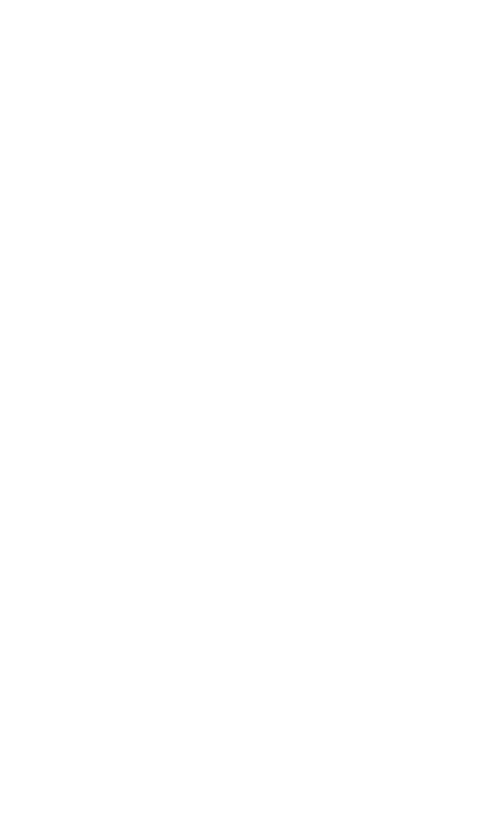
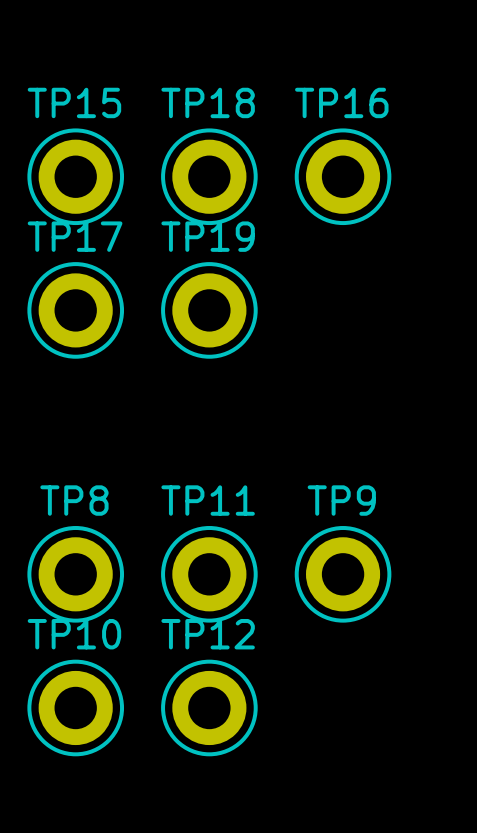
TP15: none -> (75, 176)
TP18: none -> (209, 176)
TP16: none -> (343, 176)
TP17: none -> (75, 310)
TP19: none -> (209, 310)
TP8: none -> (75, 574)
TP11: none -> (209, 574)
TP9: none -> (343, 574)
TP10: none -> (75, 707)
TP12: none -> (209, 707)

